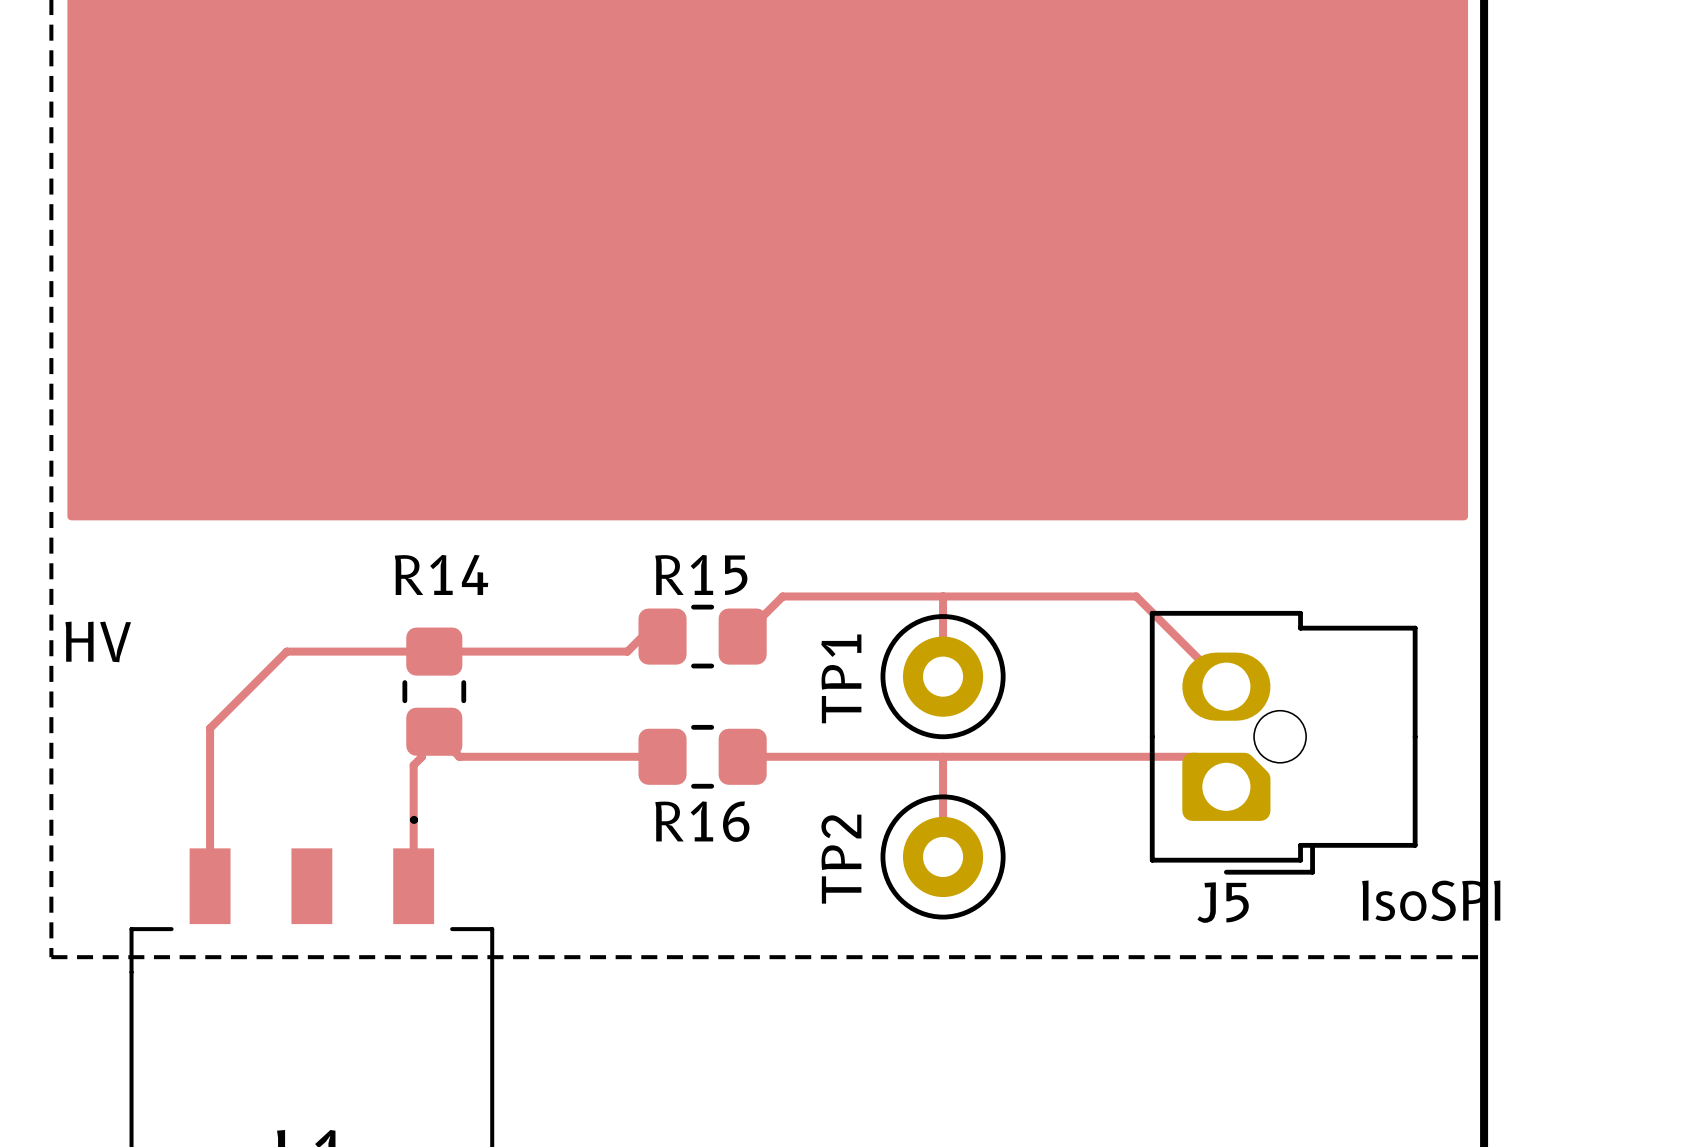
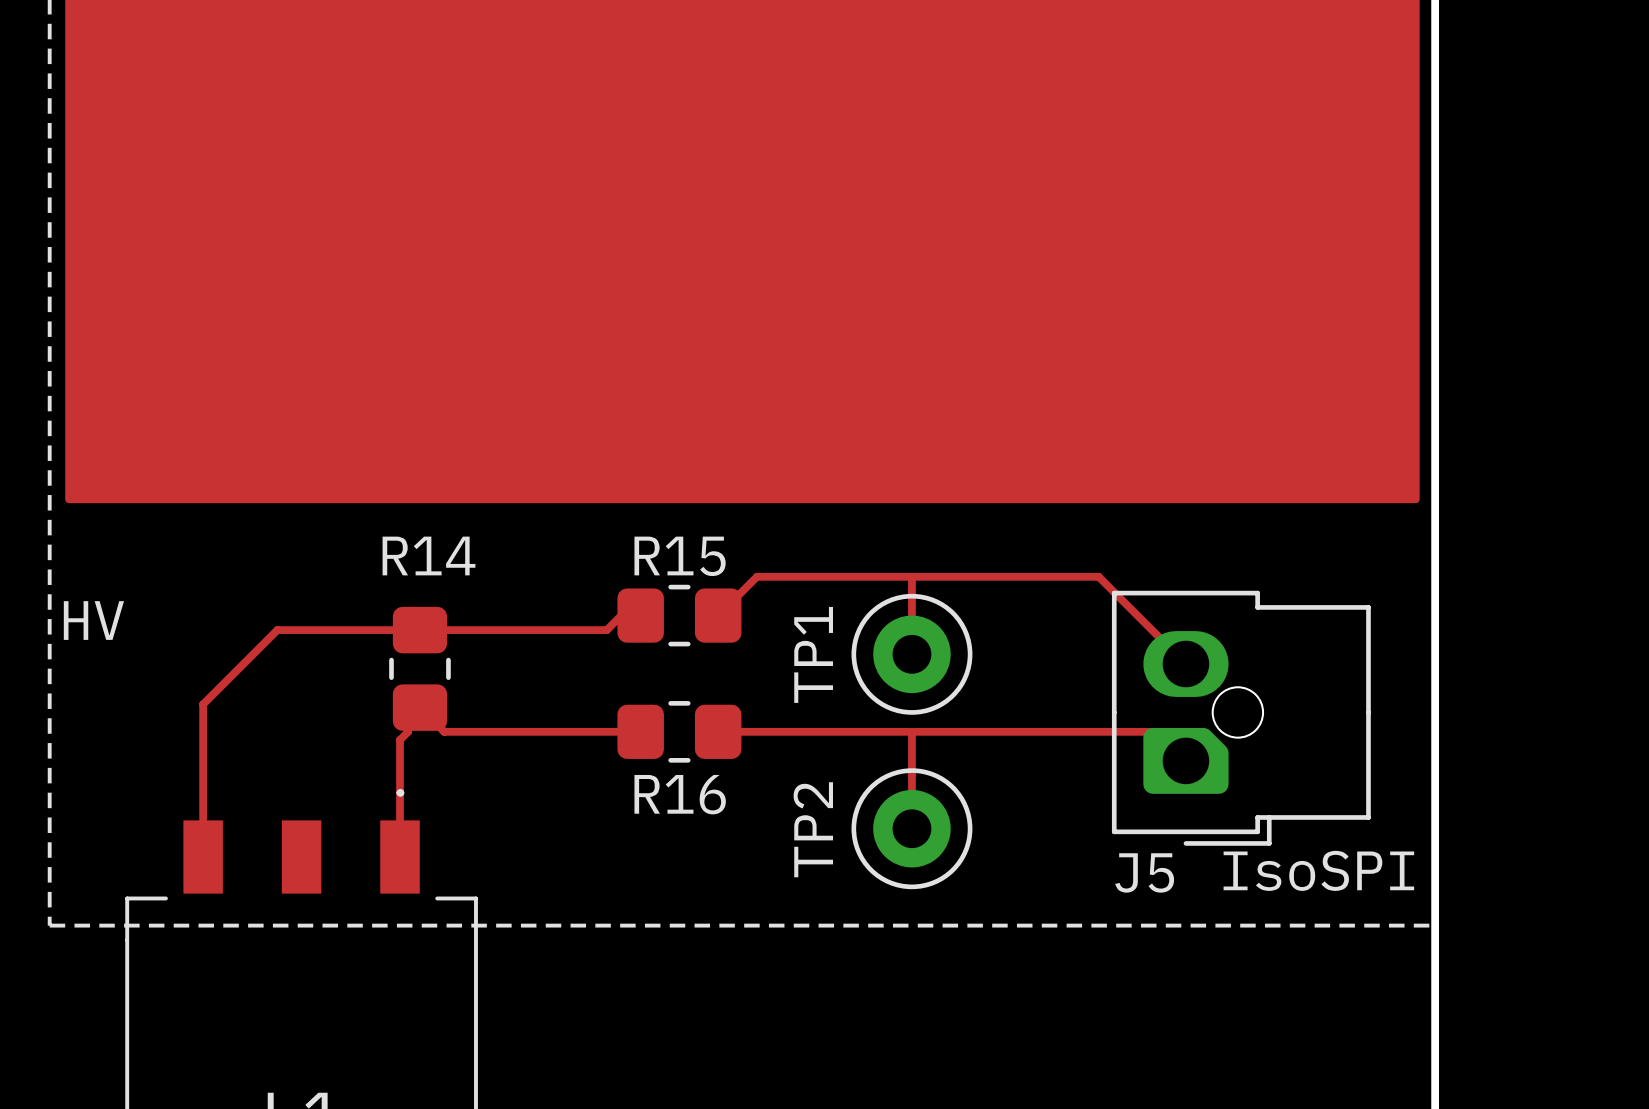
J5 value position: IsoSPI (1431, 900) -> IsoSPI (1318, 870)
J5 name position: J5 (1223, 902) -> J5 (1144, 872)

